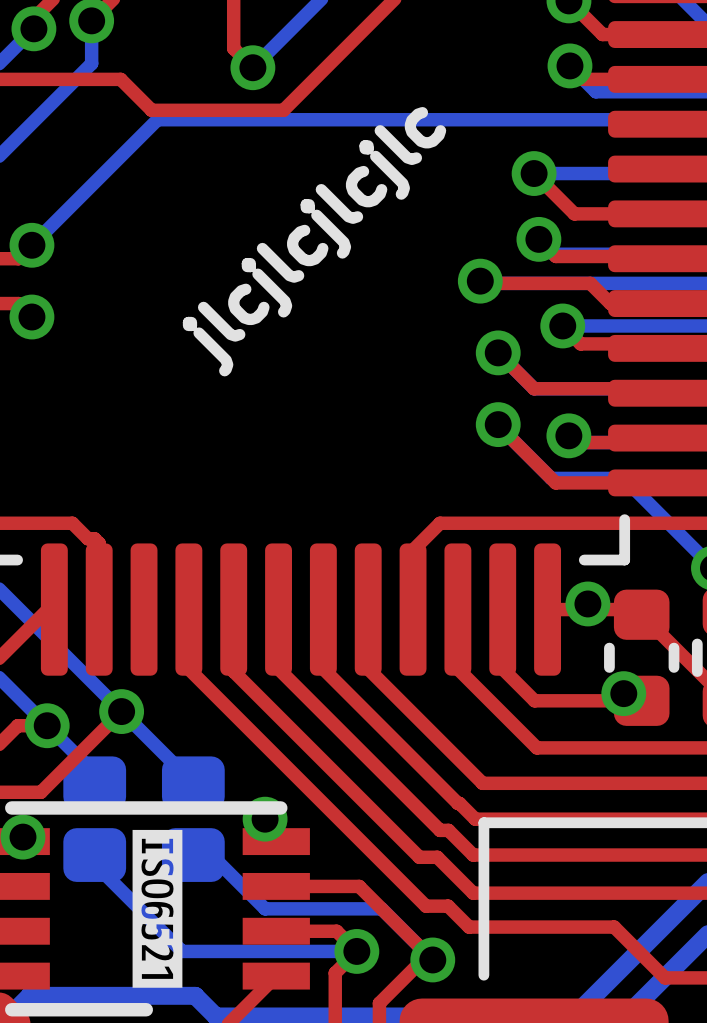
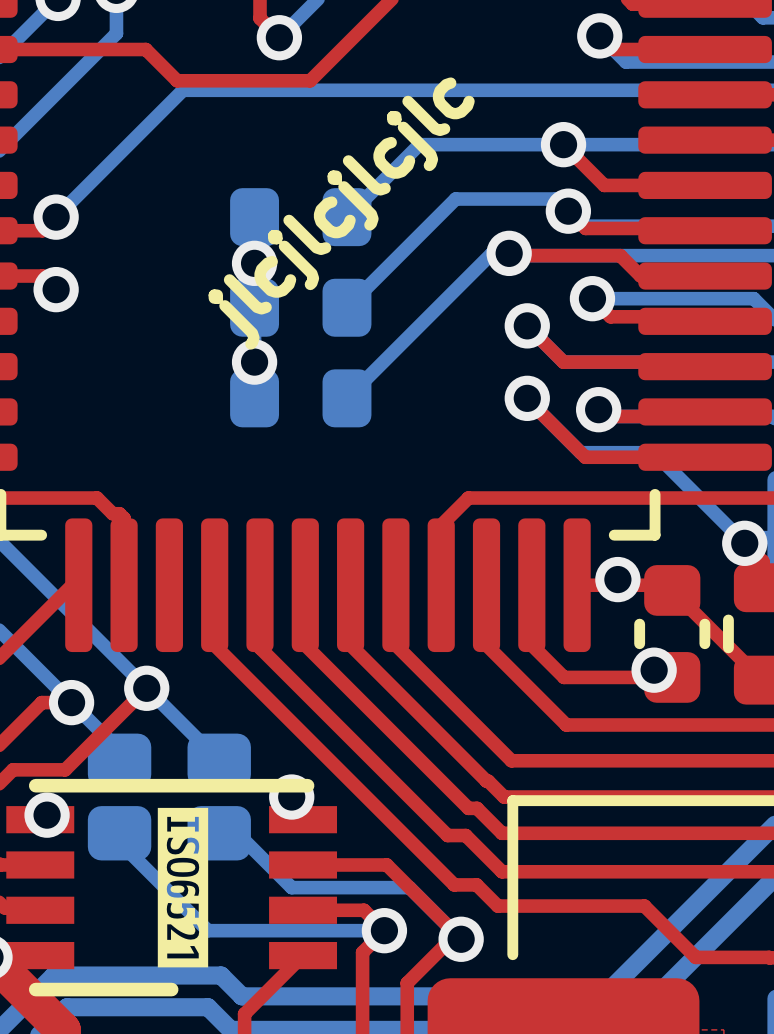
bottom track: none -> (563, 144) (419, 144) (346, 217)
bottom track: none -> (568, 211) (556, 199) (455, 199) (346, 307)
part: none -> (300, 217)
bottom track: none -> (509, 253) (491, 253) (346, 398)
via: none -> (254, 263)
part: none -> (300, 307)
via: none -> (254, 362)
part: none -> (300, 398)

